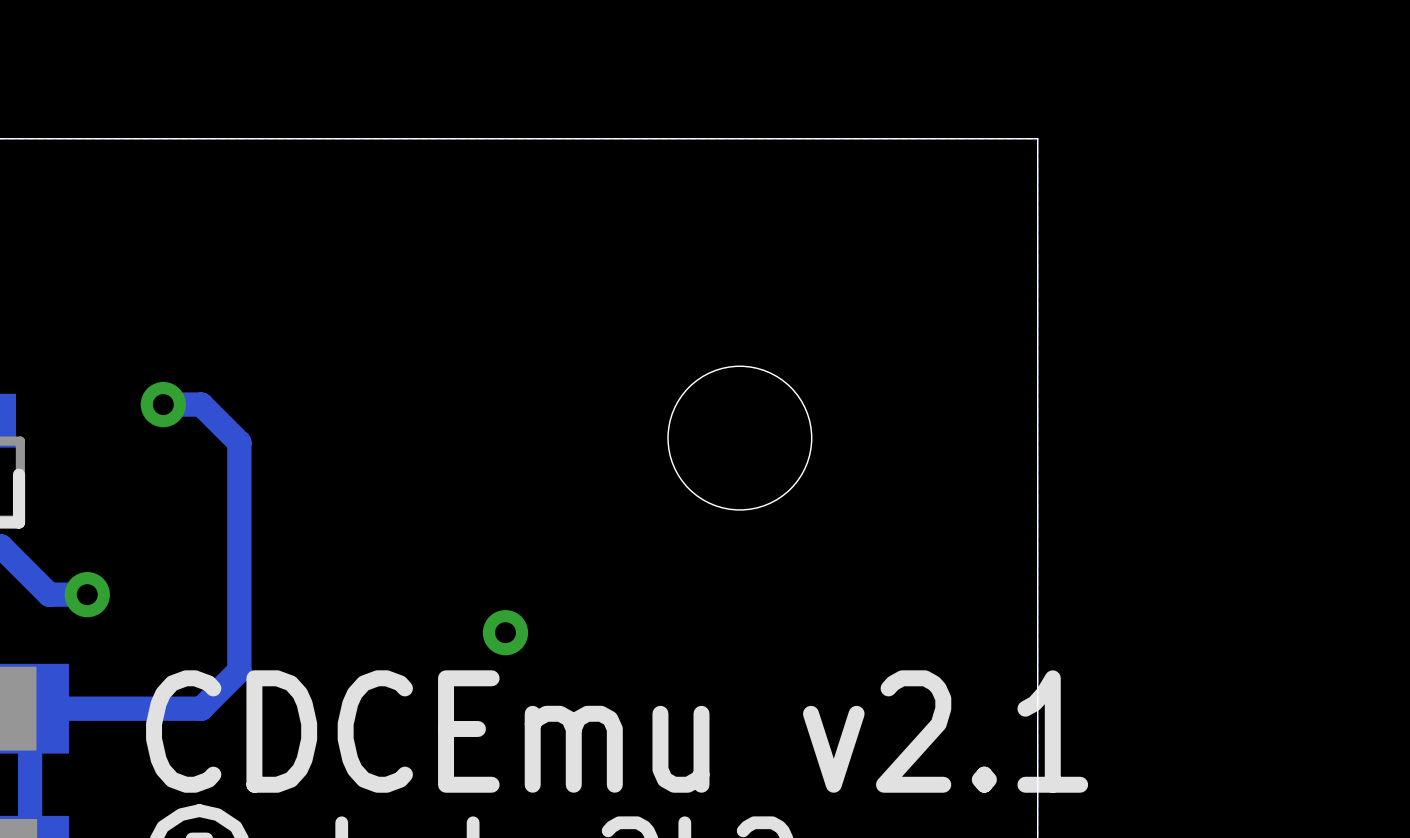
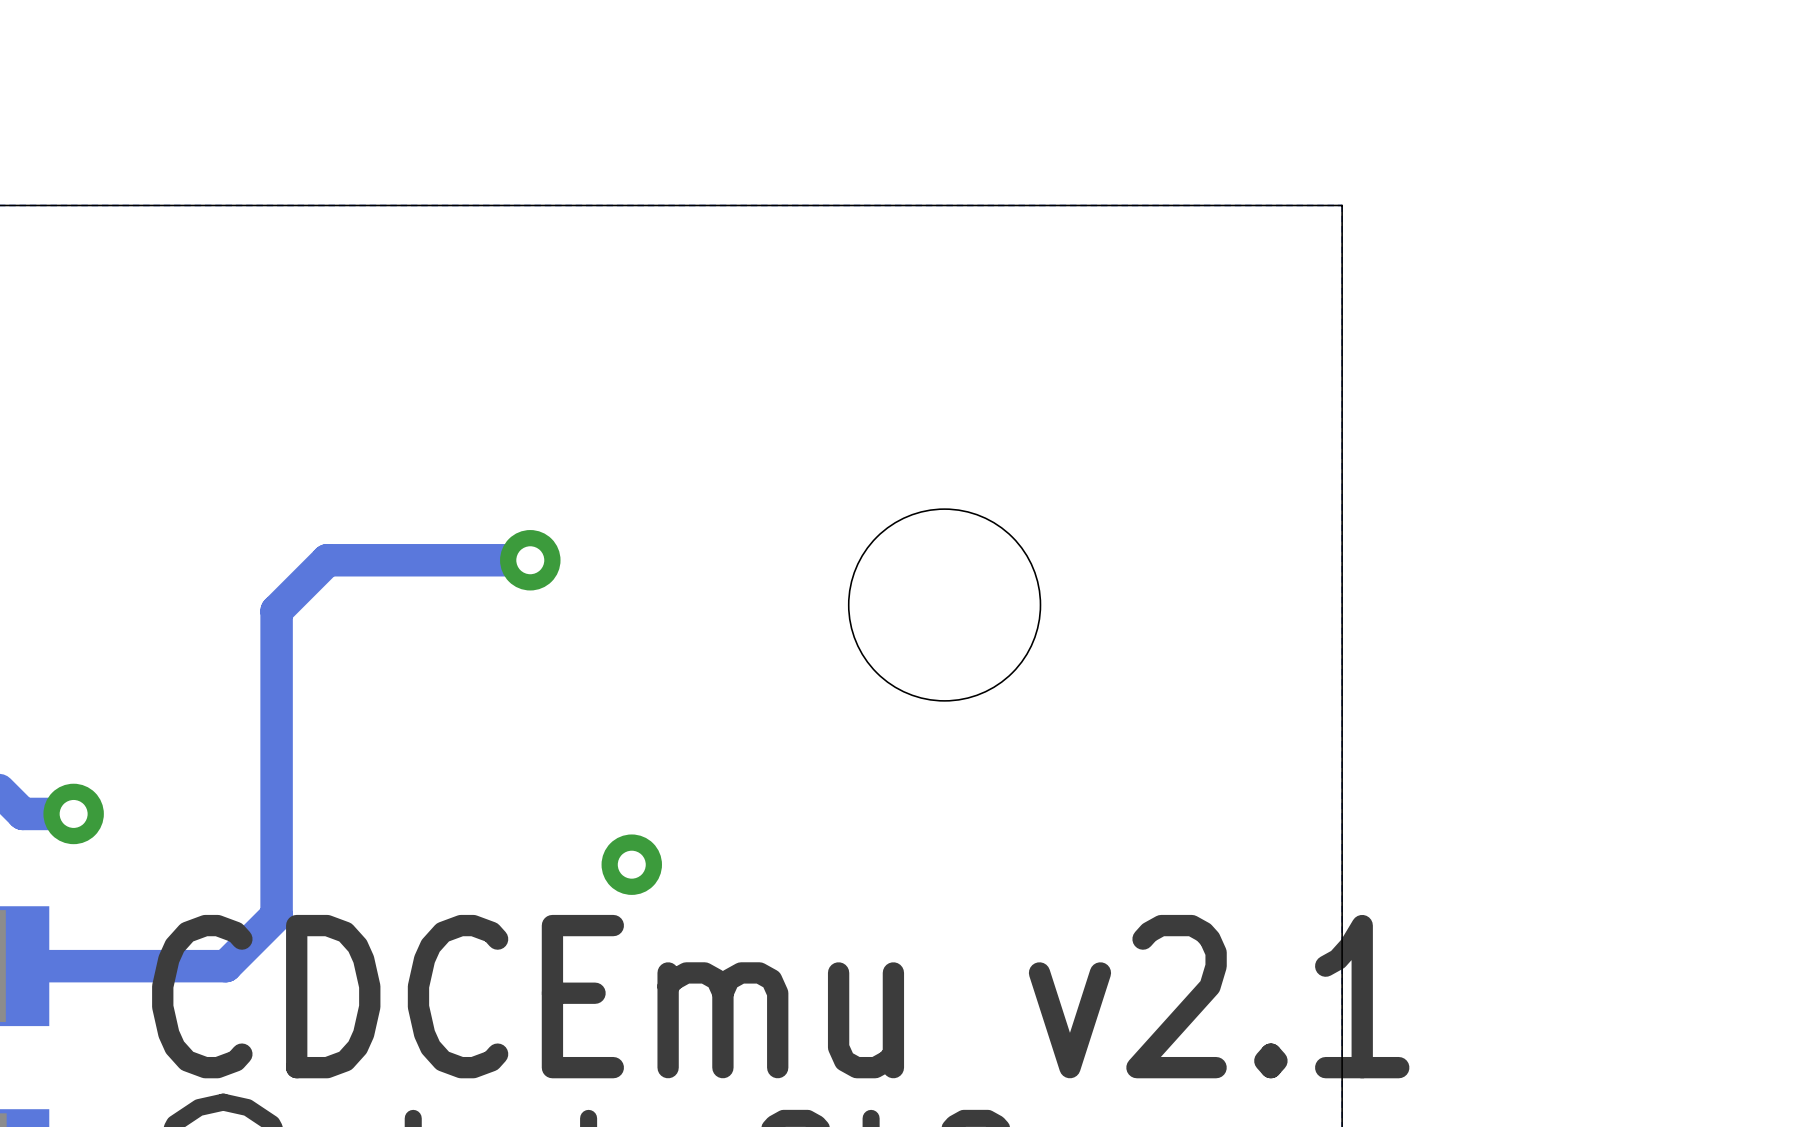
track: (163, 404) (201, 404) (239, 442) -> (530, 560) (327, 560) (276, 610)
via position: (163, 404) -> (530, 560)

